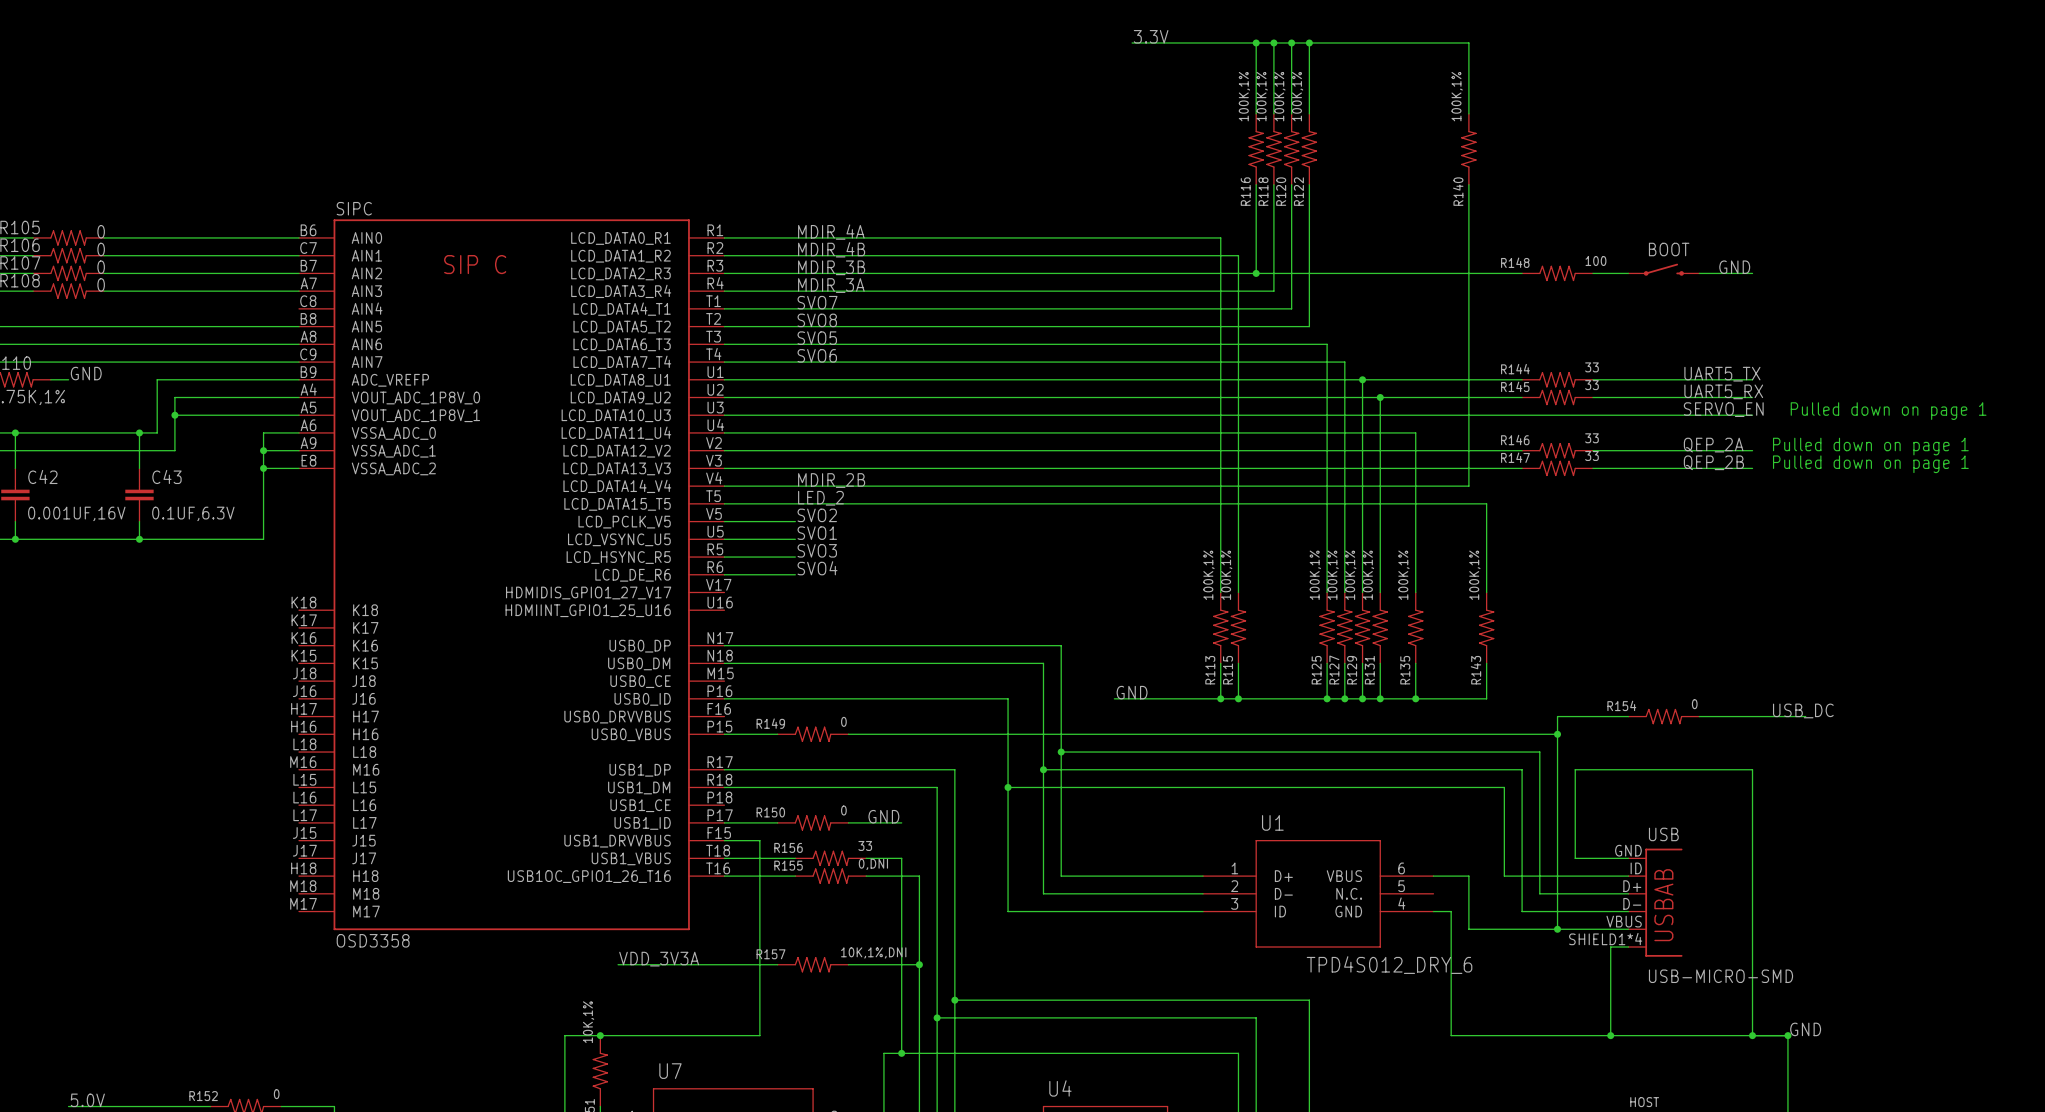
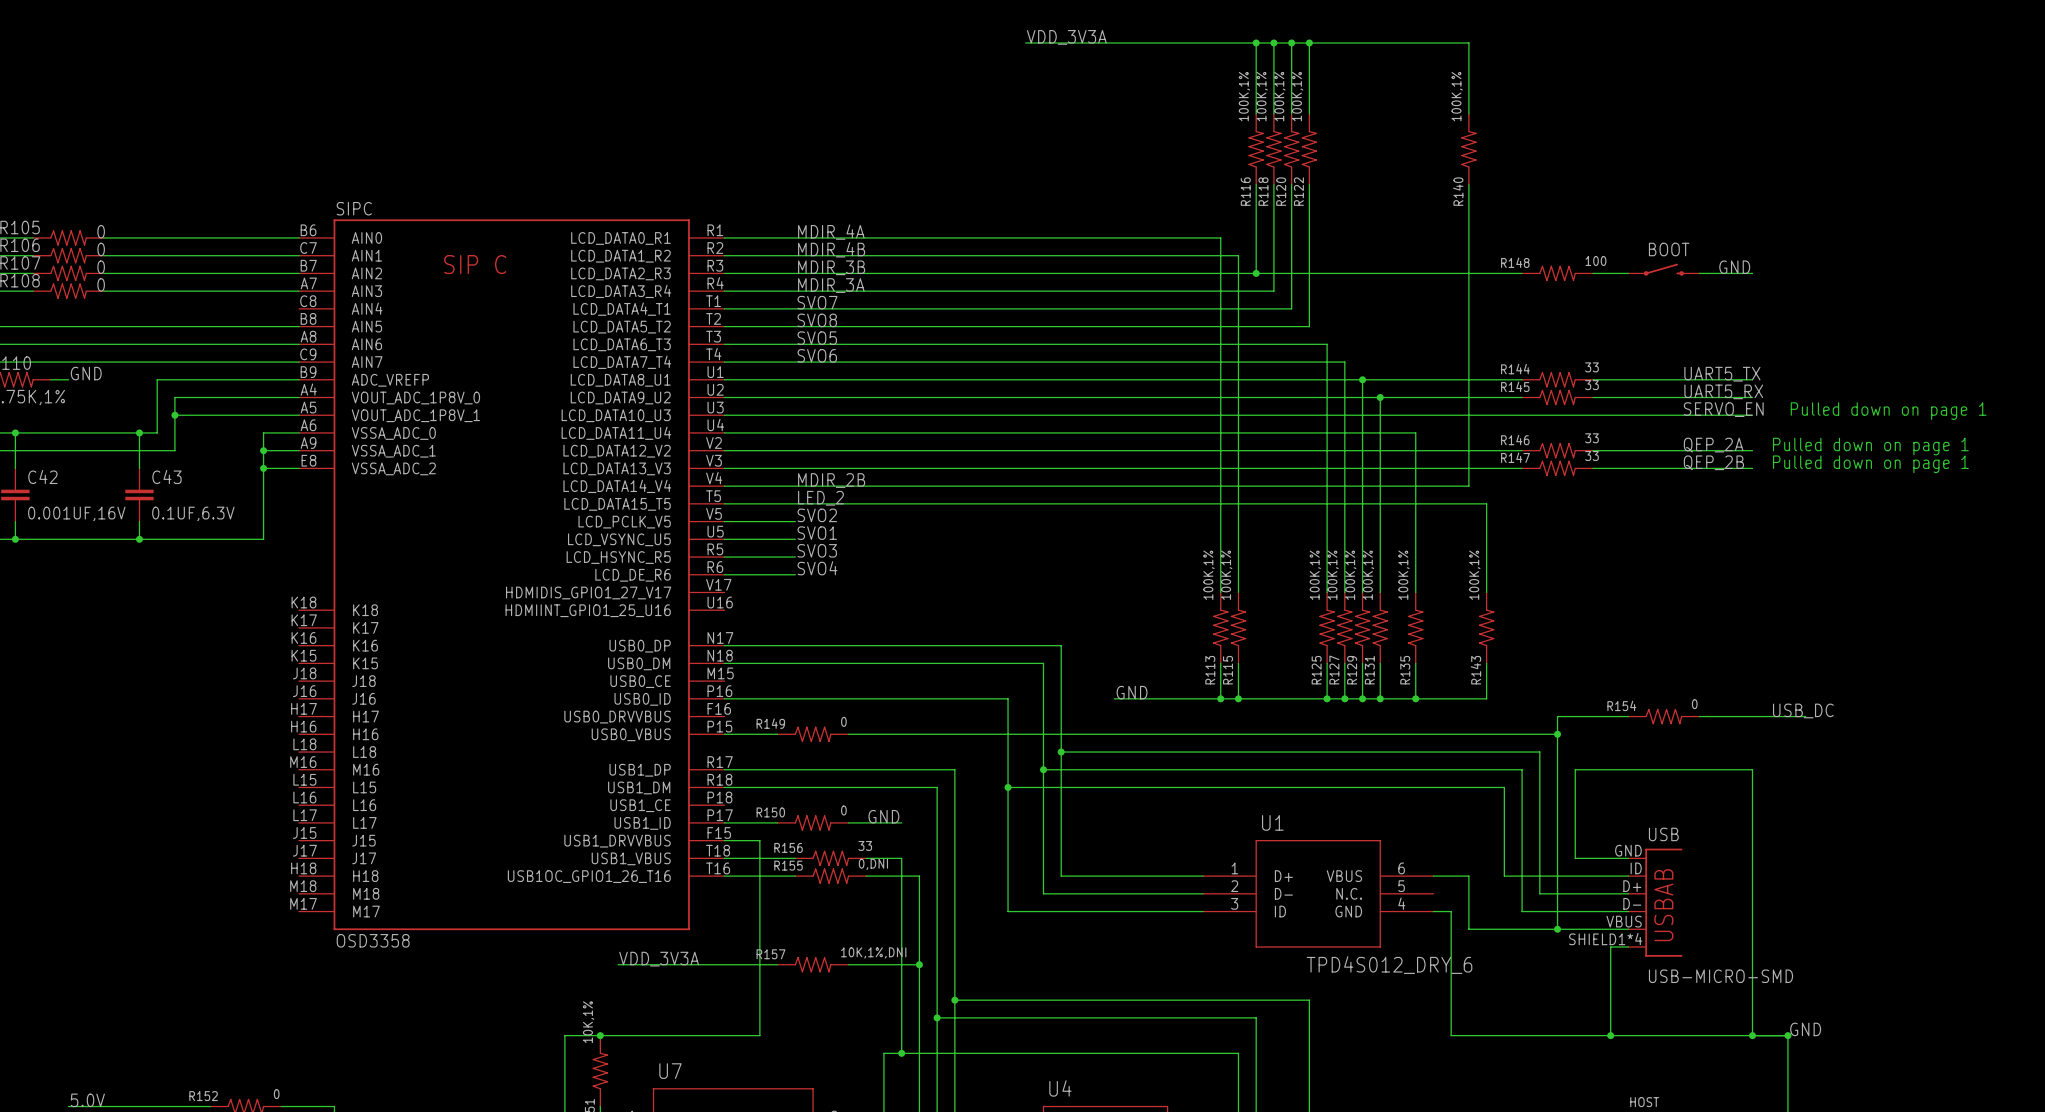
label: 3.3V (1151, 36) -> none
label: none -> VDD_3V3A (1066, 37)
wire: none -> (1025, 42) (1132, 42)

